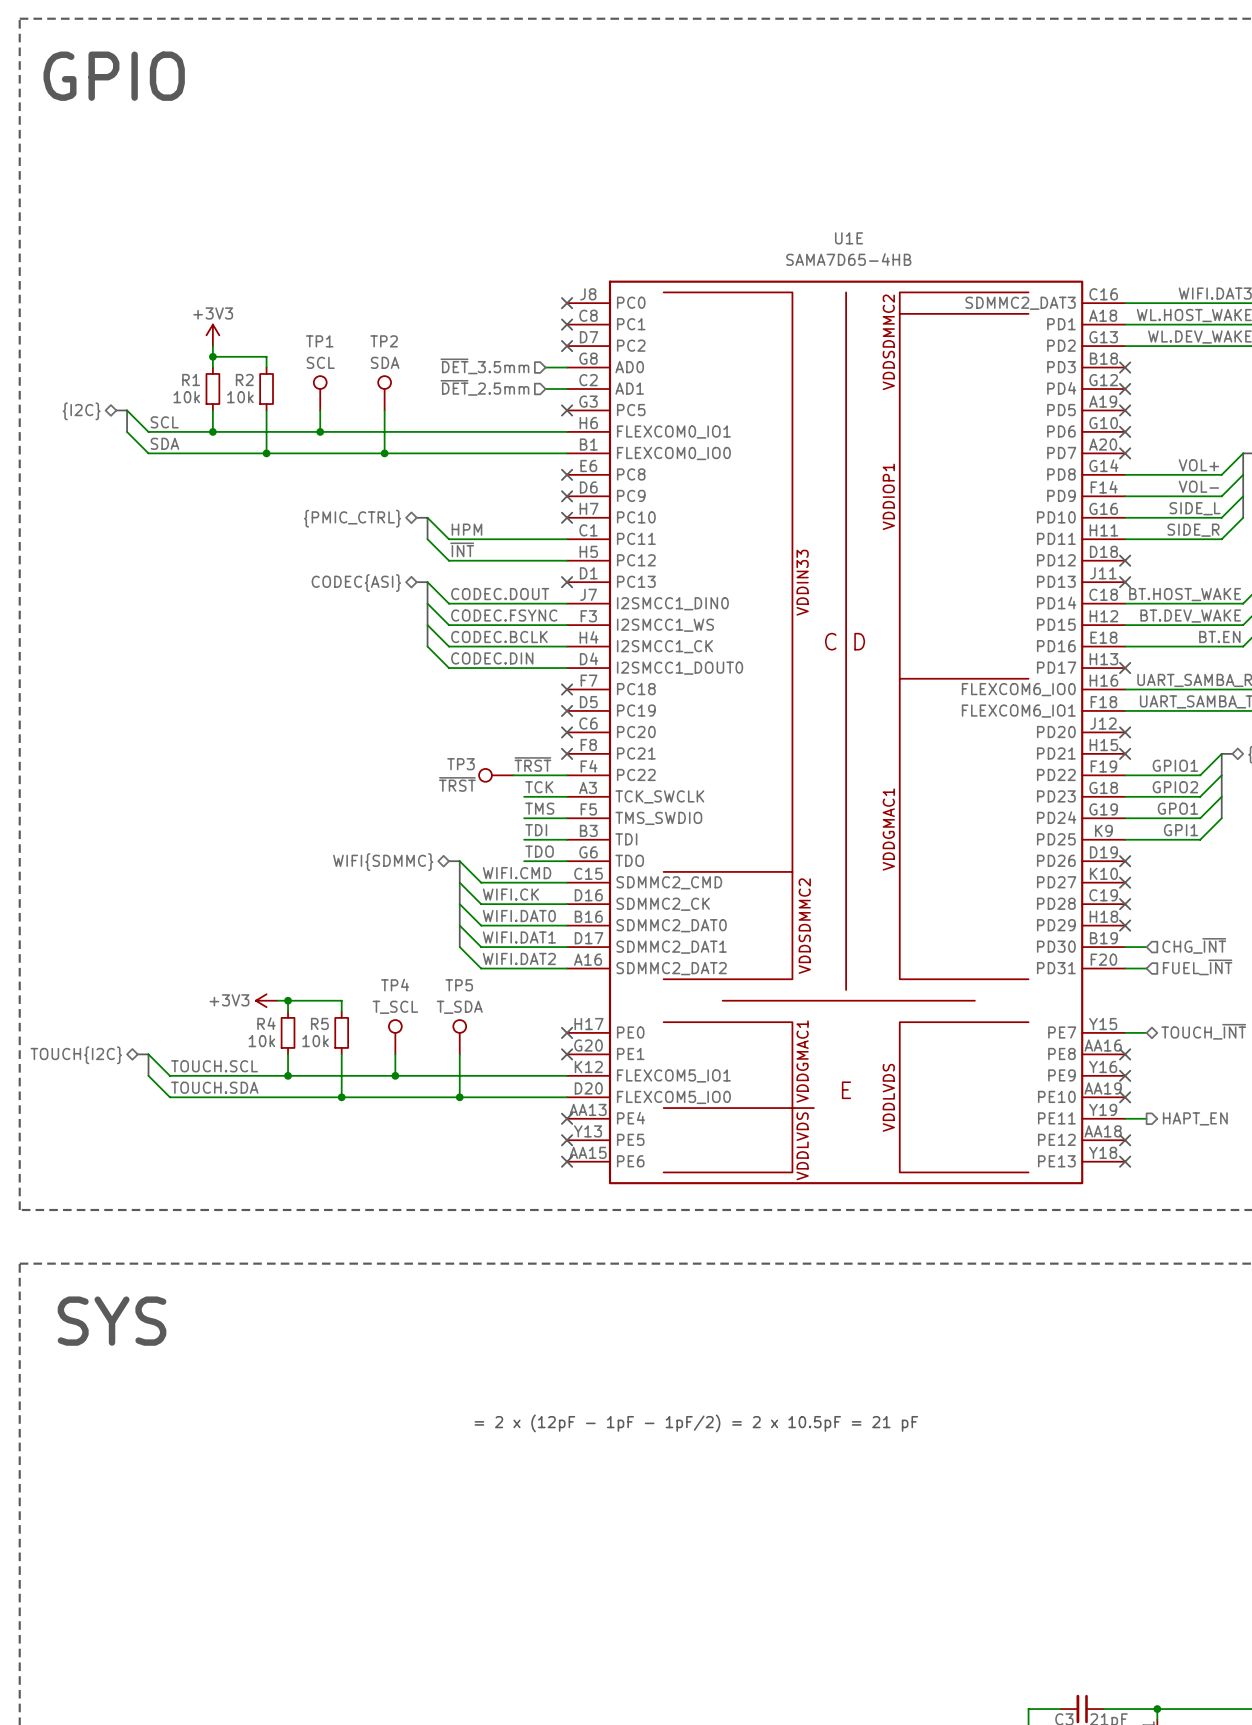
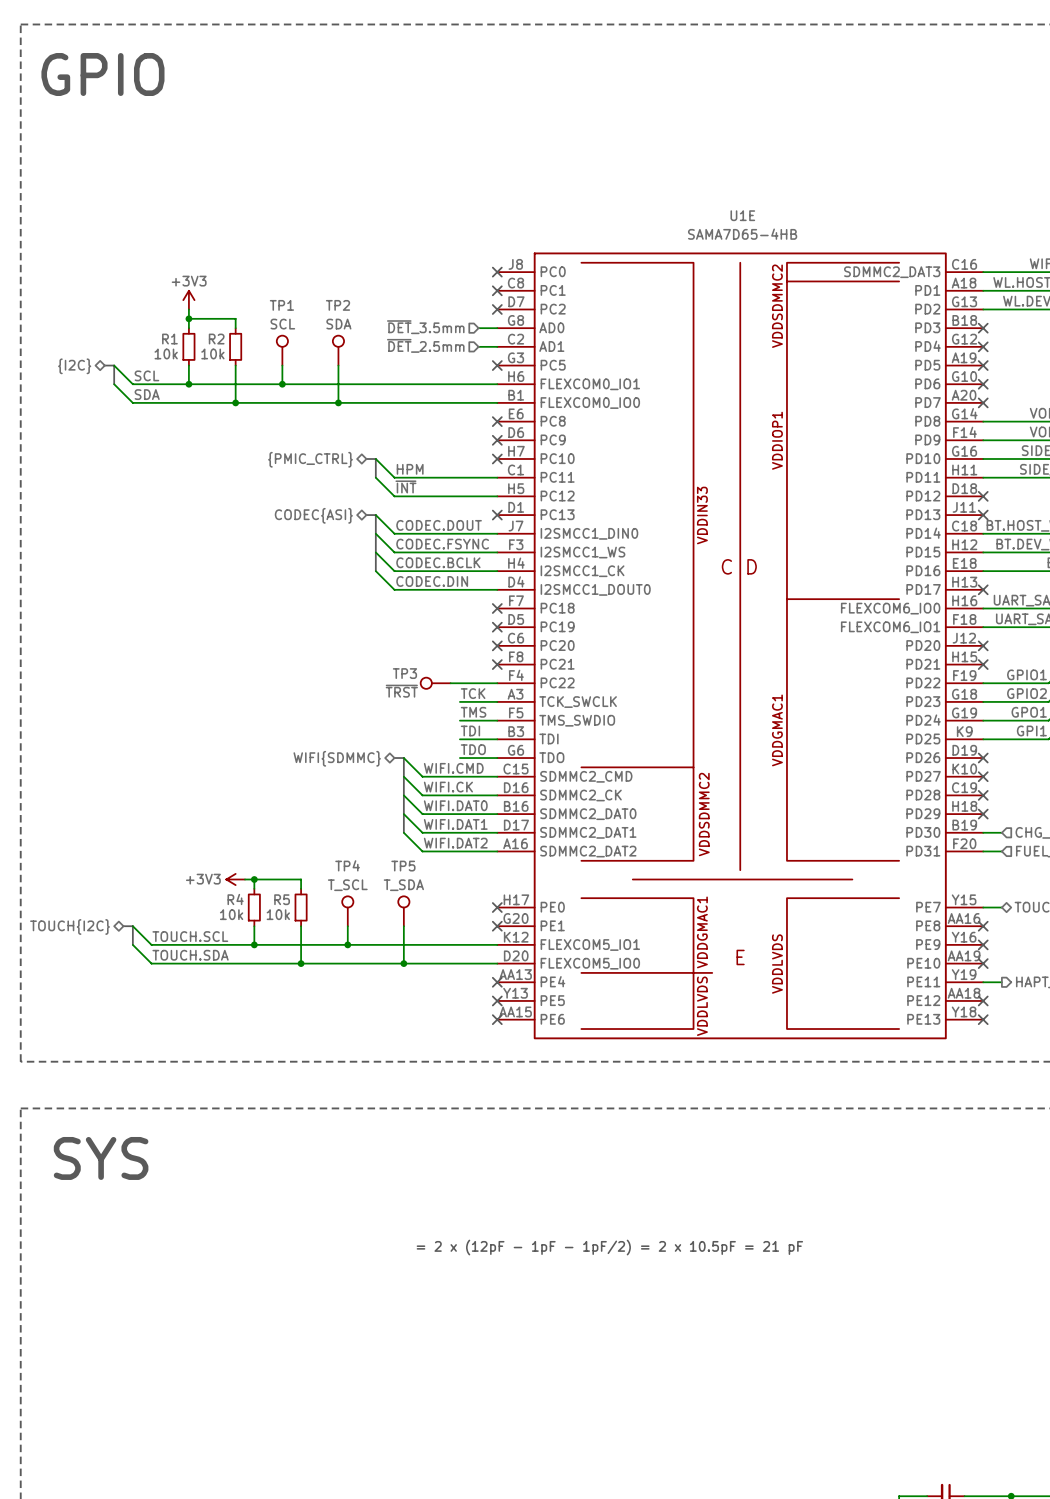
label: ~{TRST} (532, 764) -> none

